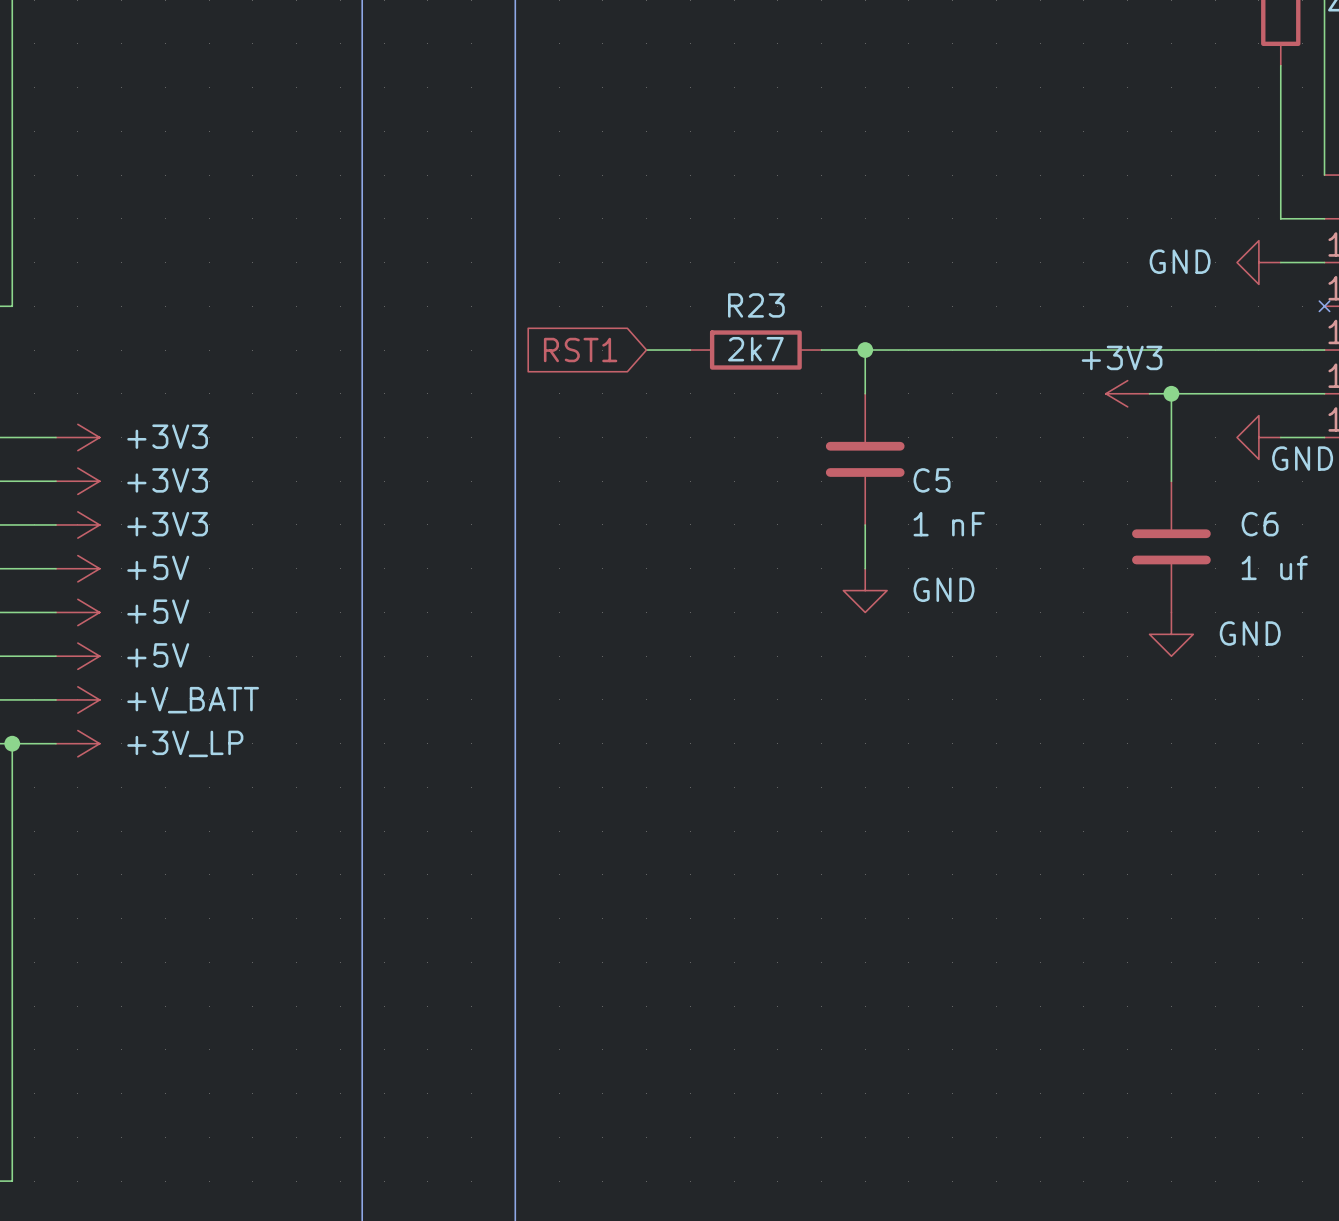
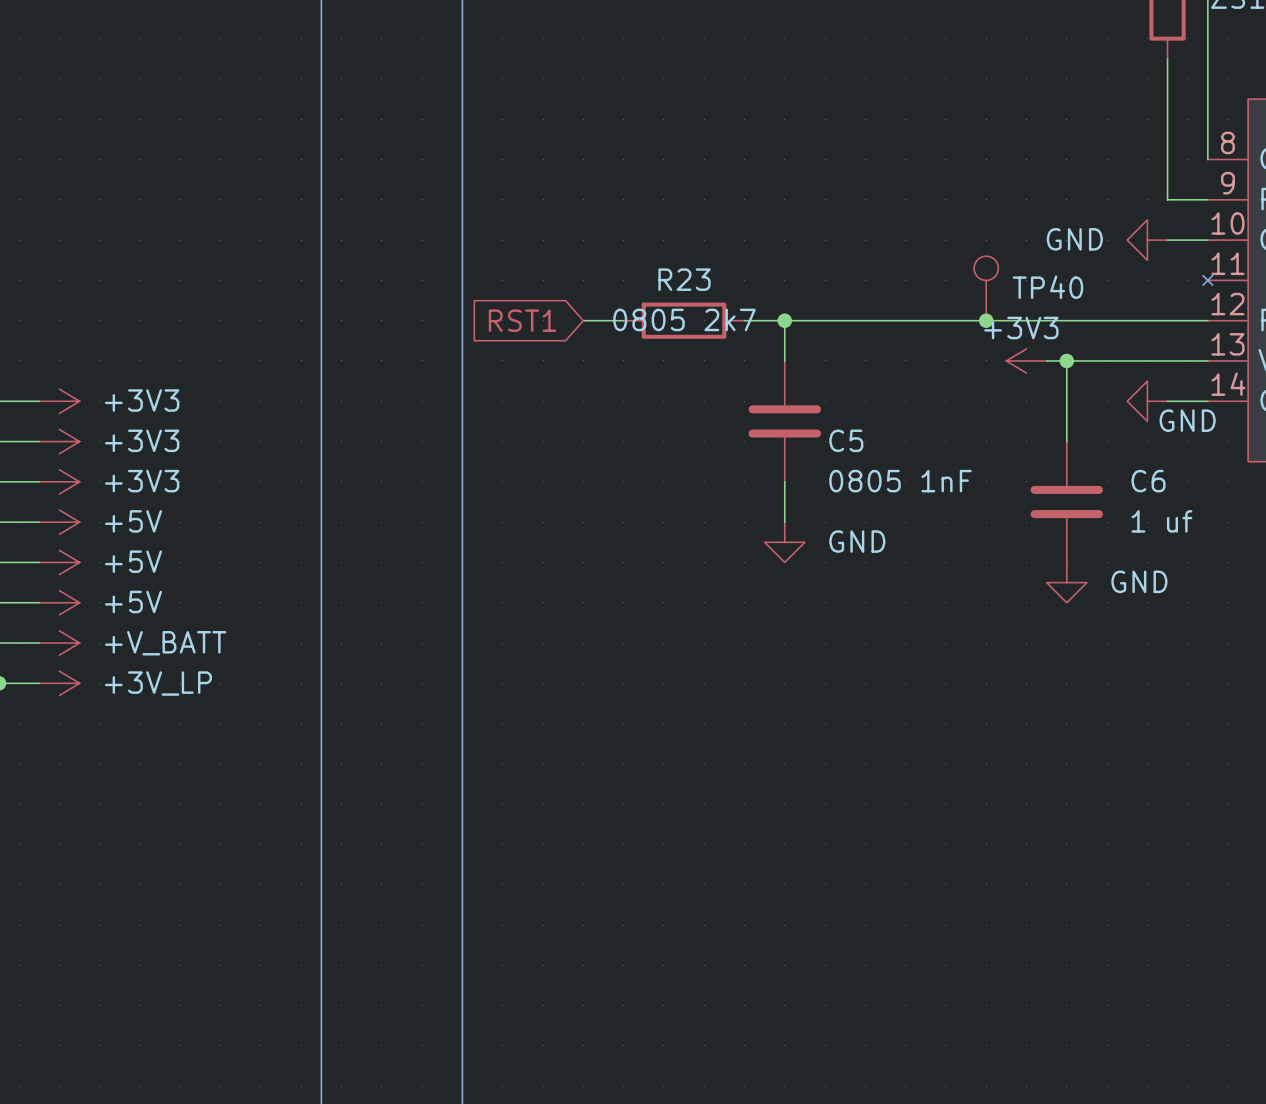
TP40: none -> (986, 288)
R23 value: 2k7 (755, 349) -> 0805 2k7 (684, 319)
junction: none -> (986, 320)
C5 value: 1 nF (949, 524) -> 0805 1nF (900, 481)

